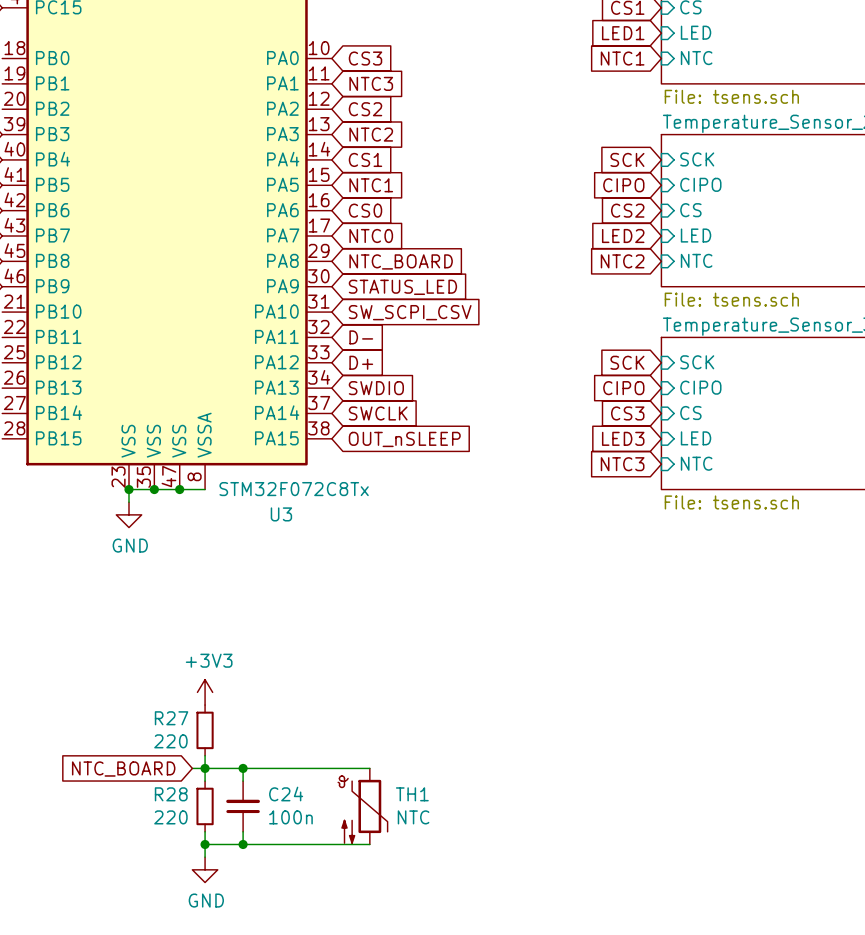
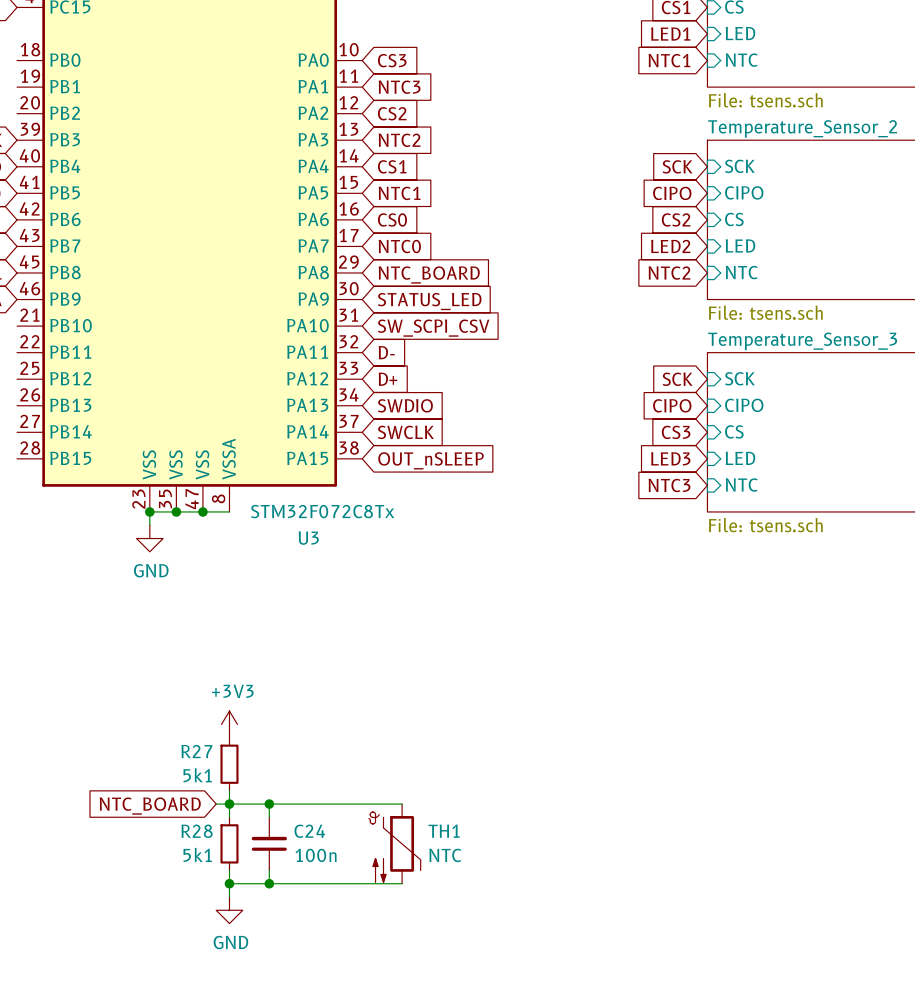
R27 value: 220 (170, 741) -> 5k1 (197, 775)
R28 value: 220 (170, 817) -> 5k1 (197, 854)

